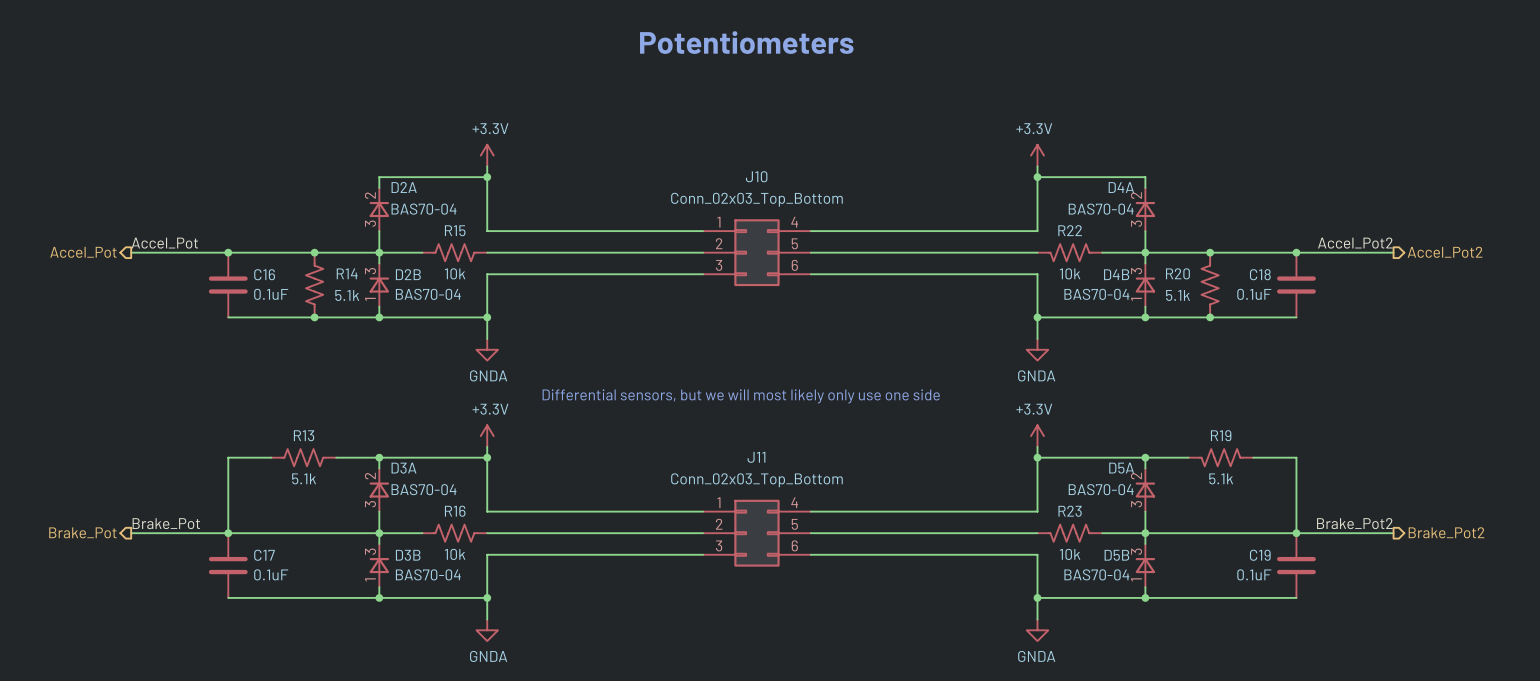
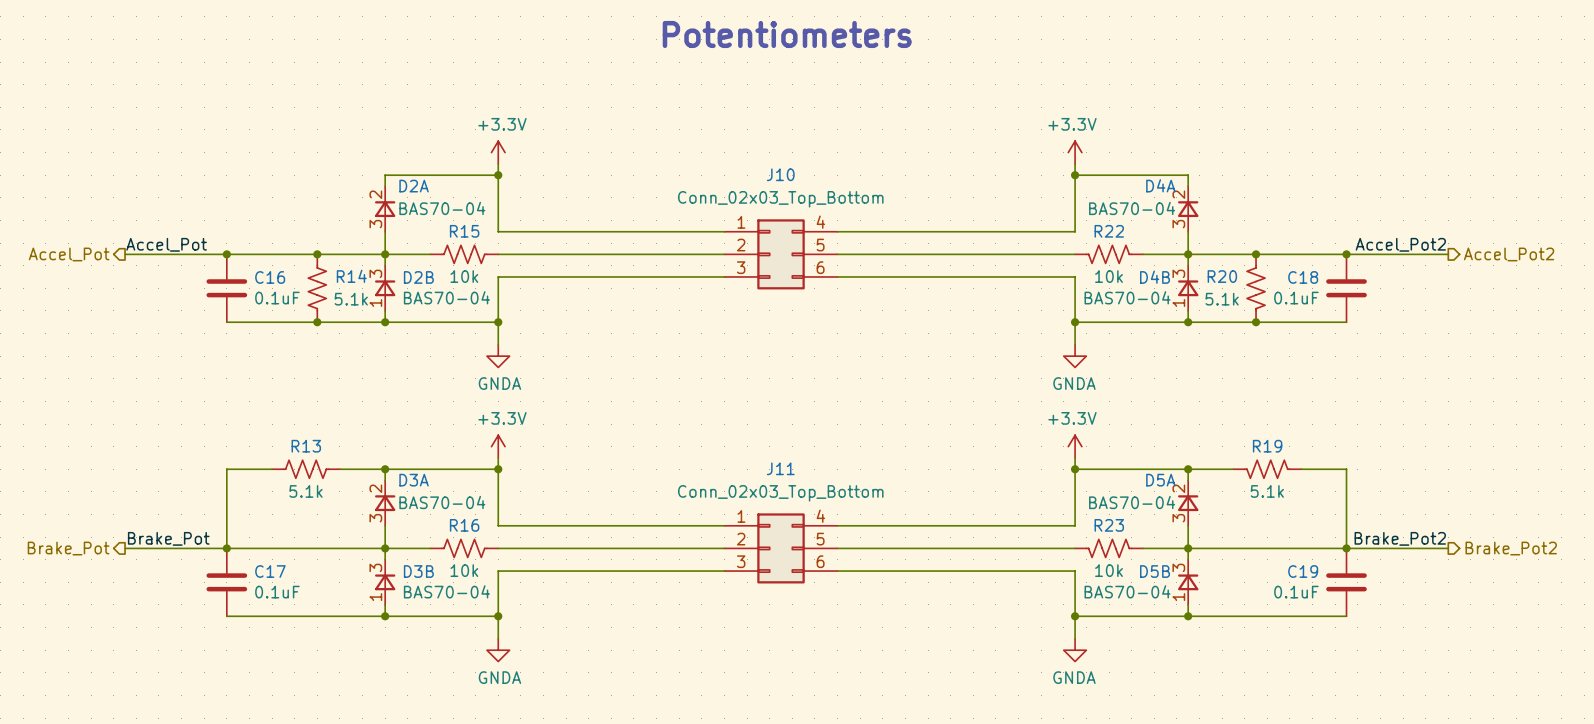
text: Differential sensors, but we will most likely only use one side (741, 396) -> none

